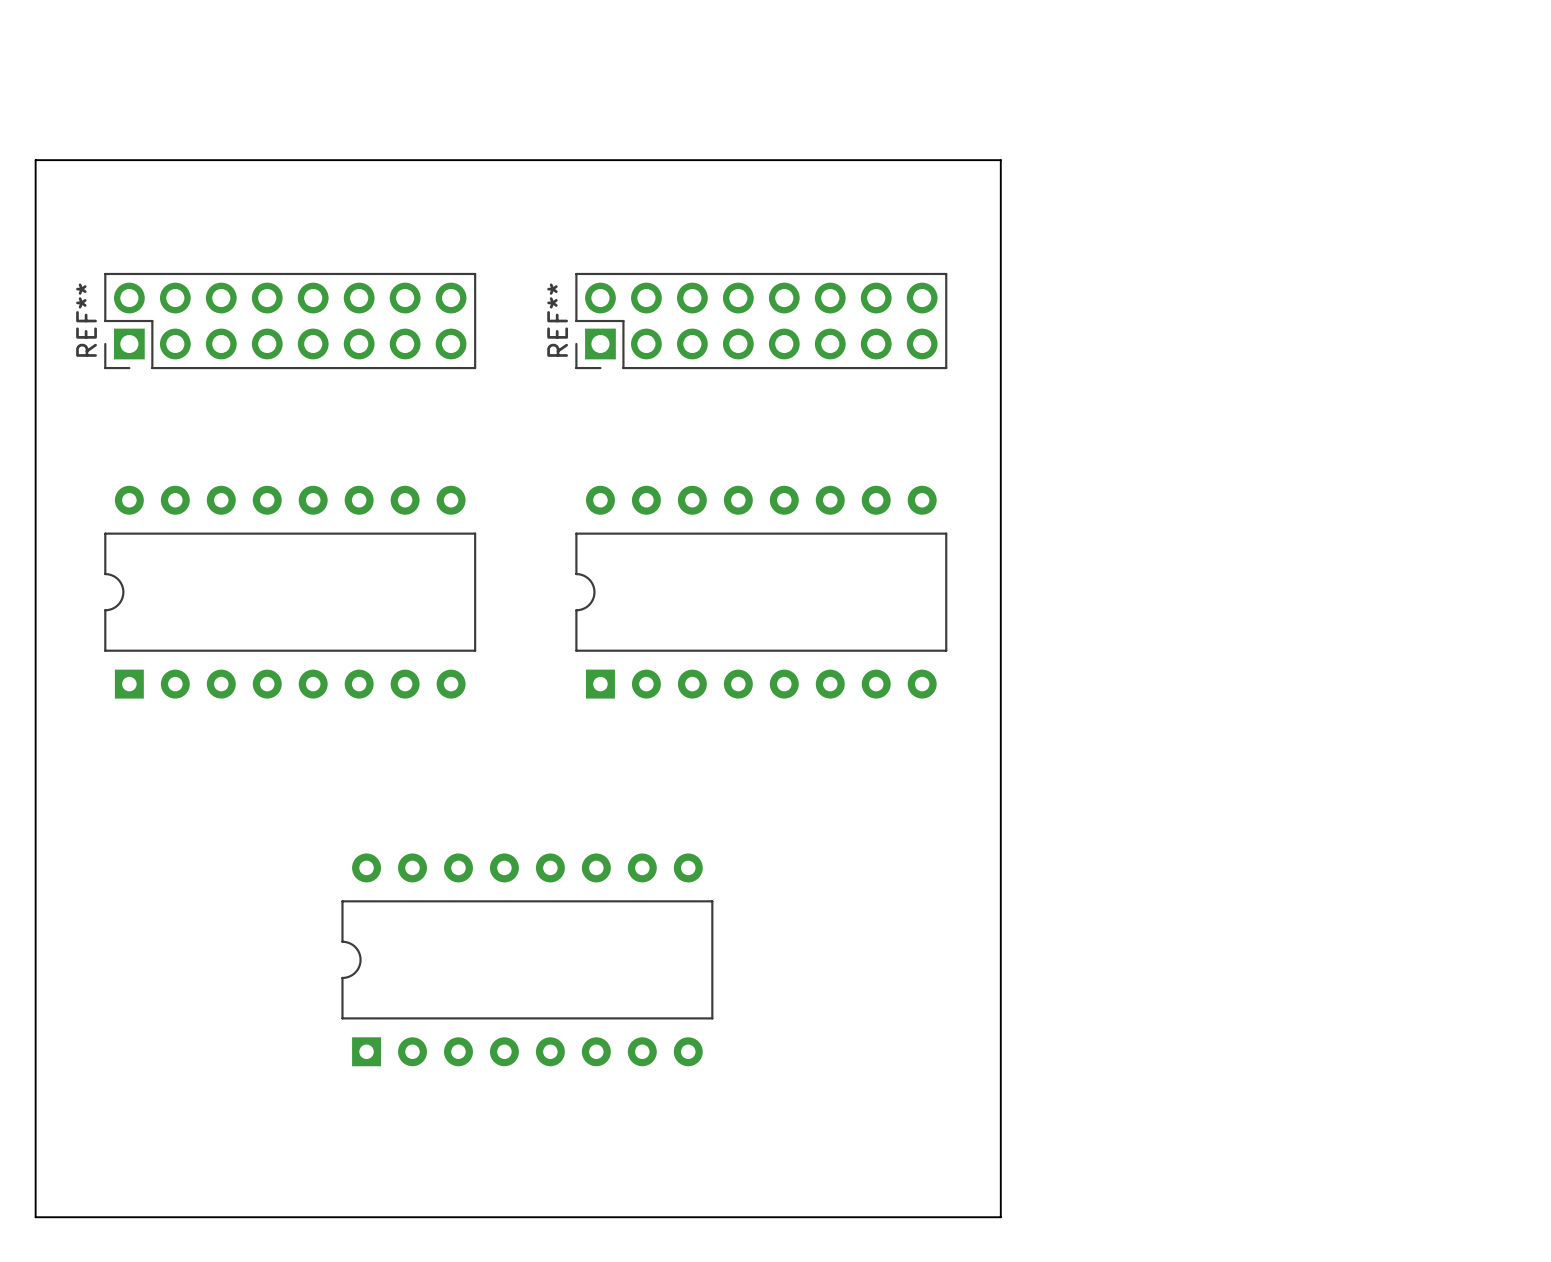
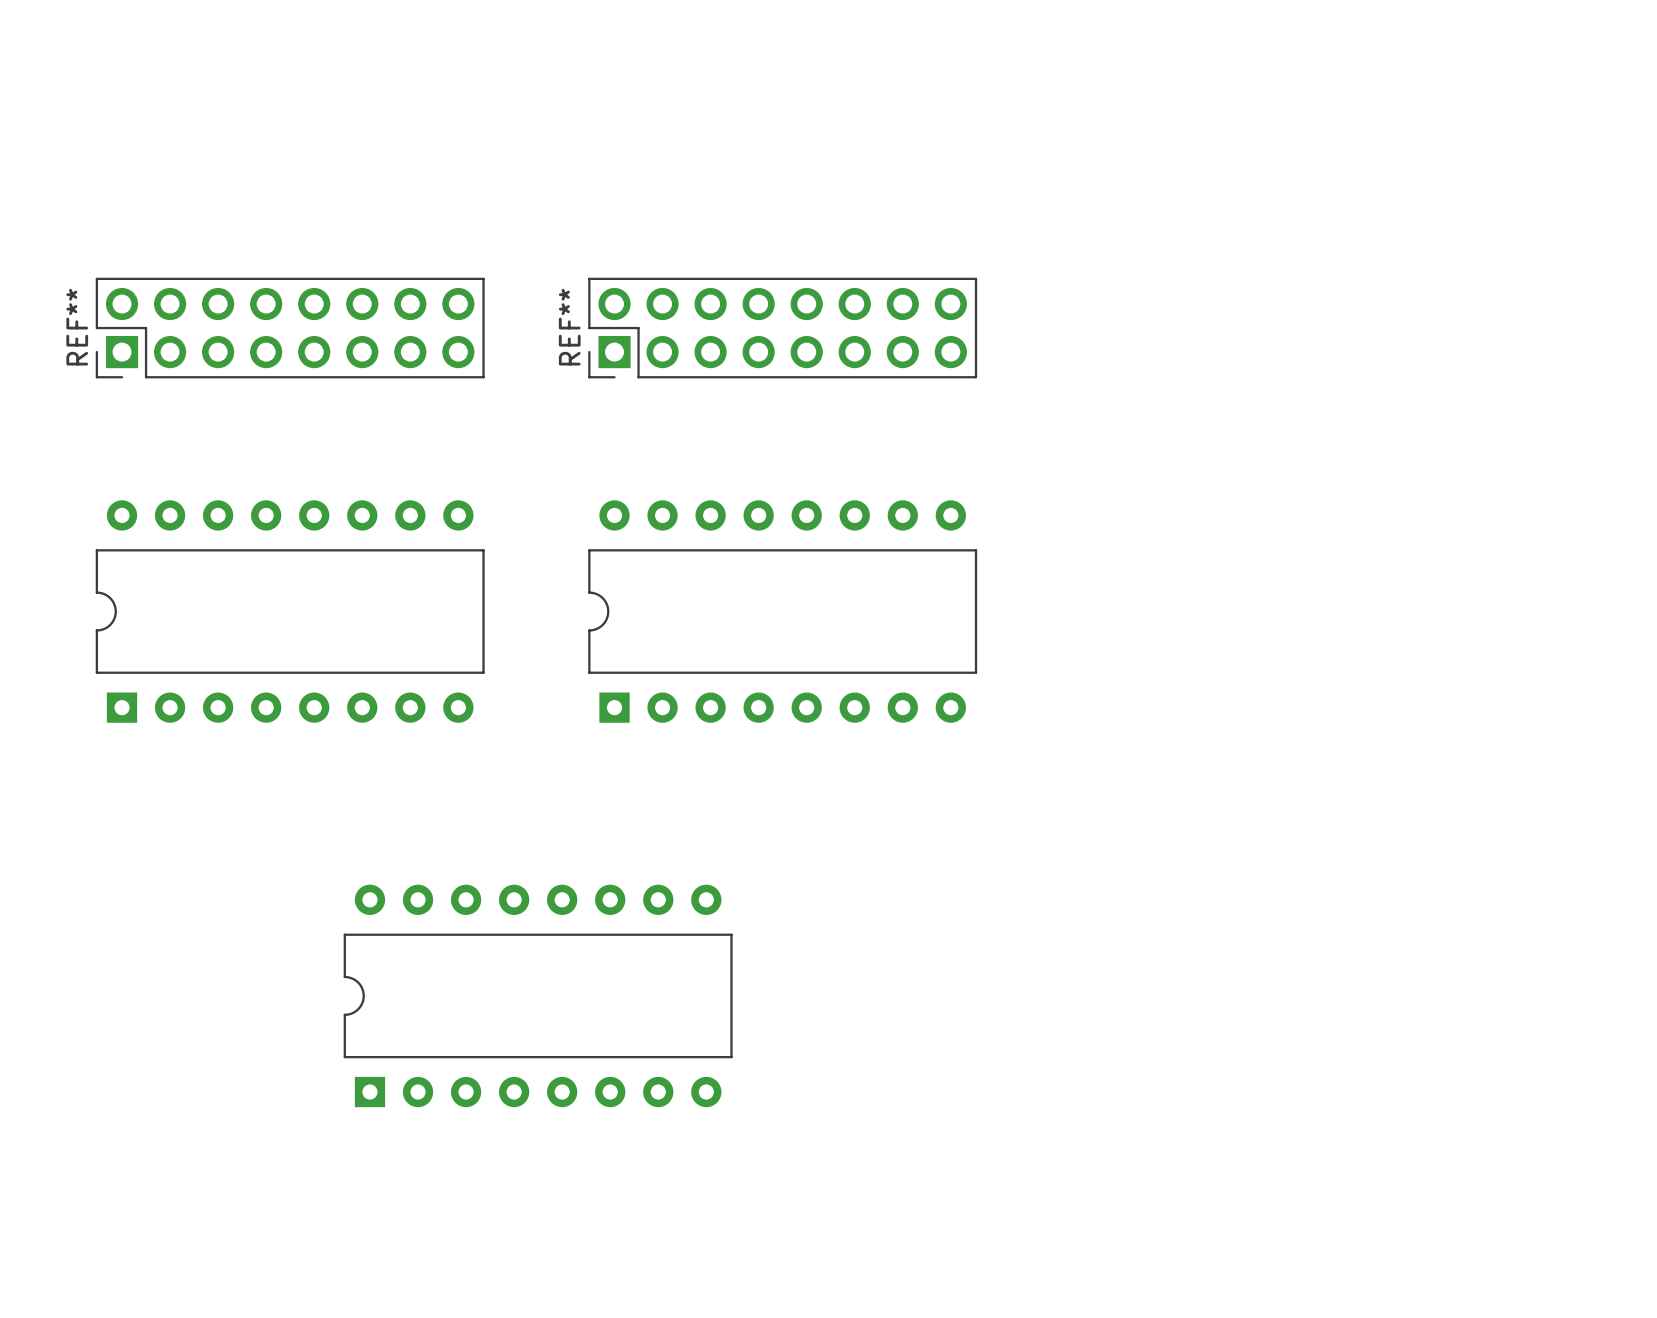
board edge: (35, 160) (1000, 160) (1000, 1217) (35, 1217) (35, 160) -> none

